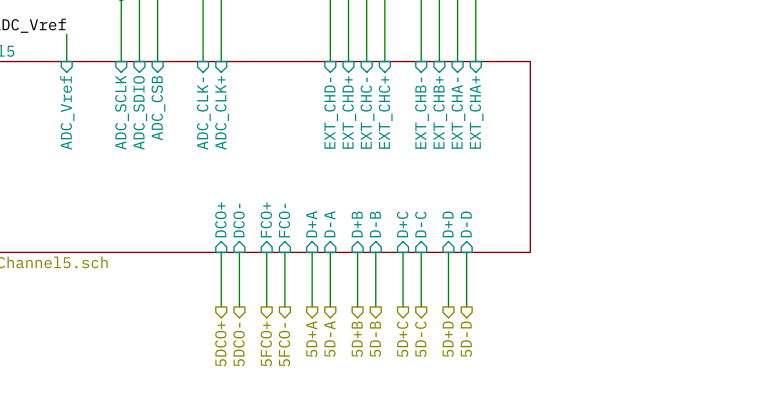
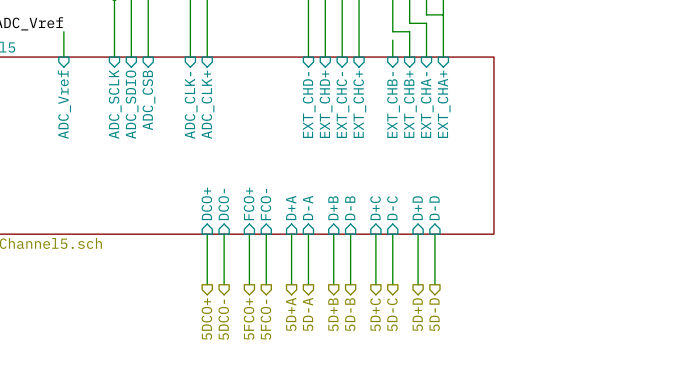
wire: (457, 16) (457, 25) -> (426, 14) (443, 14)
wire: (439, 25) (439, 34) -> (409, 23) (426, 23)
wire: (421, 34) (421, 43) -> (392, 31) (409, 31)

